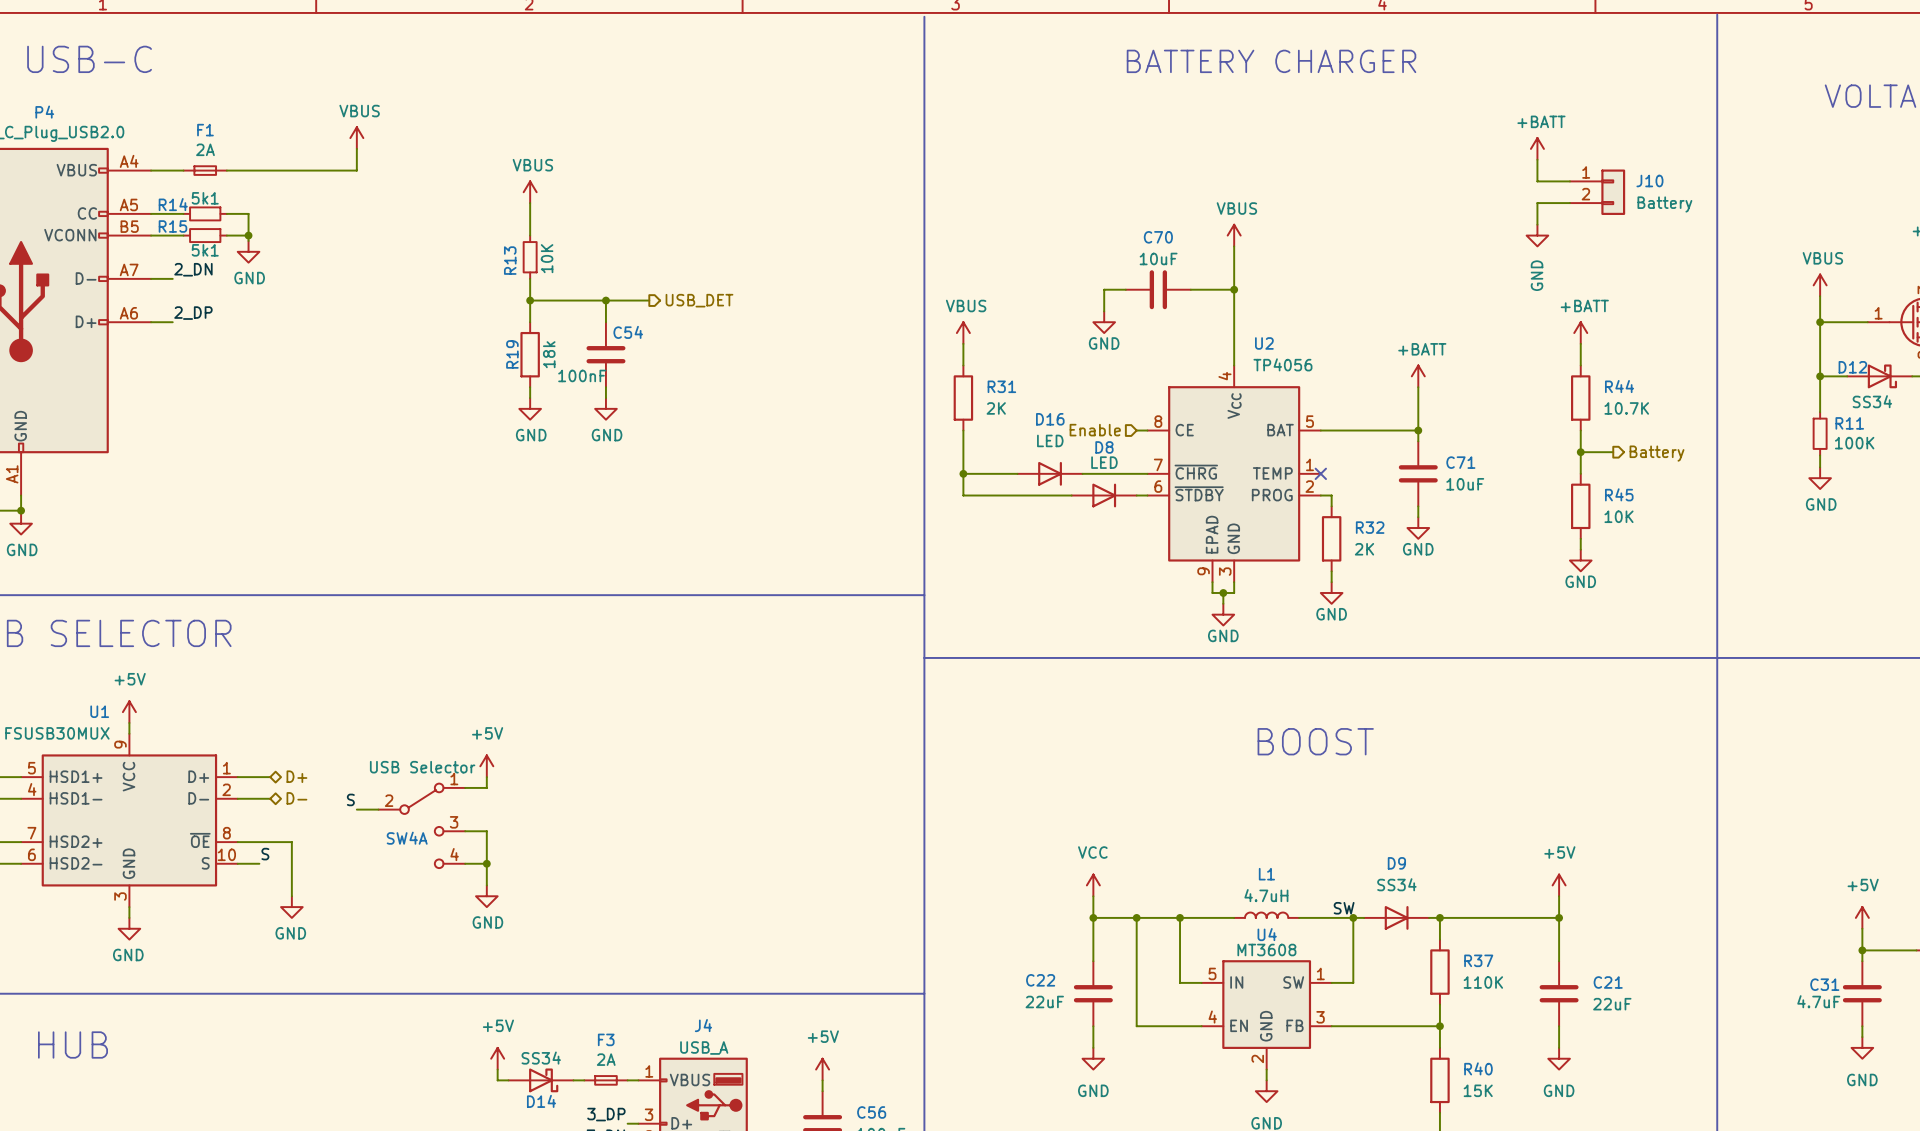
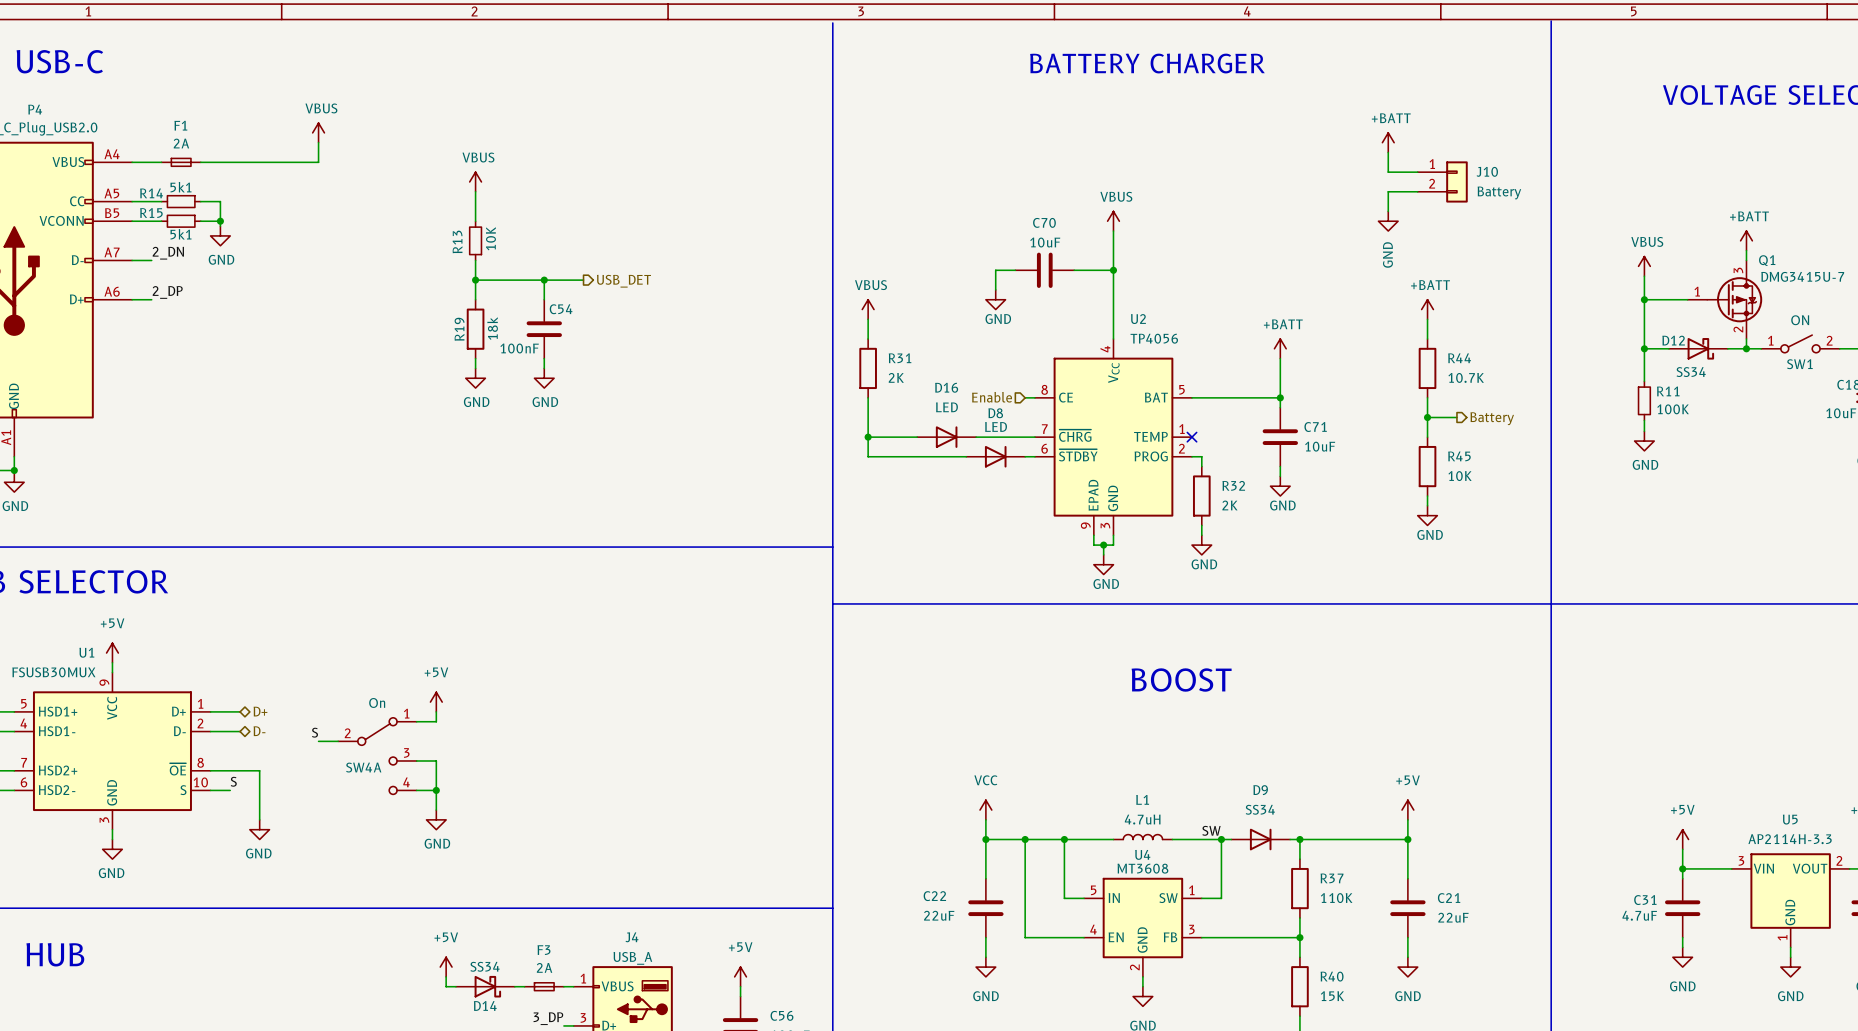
SW4A value: USB Selector (422, 767) -> On (377, 702)

